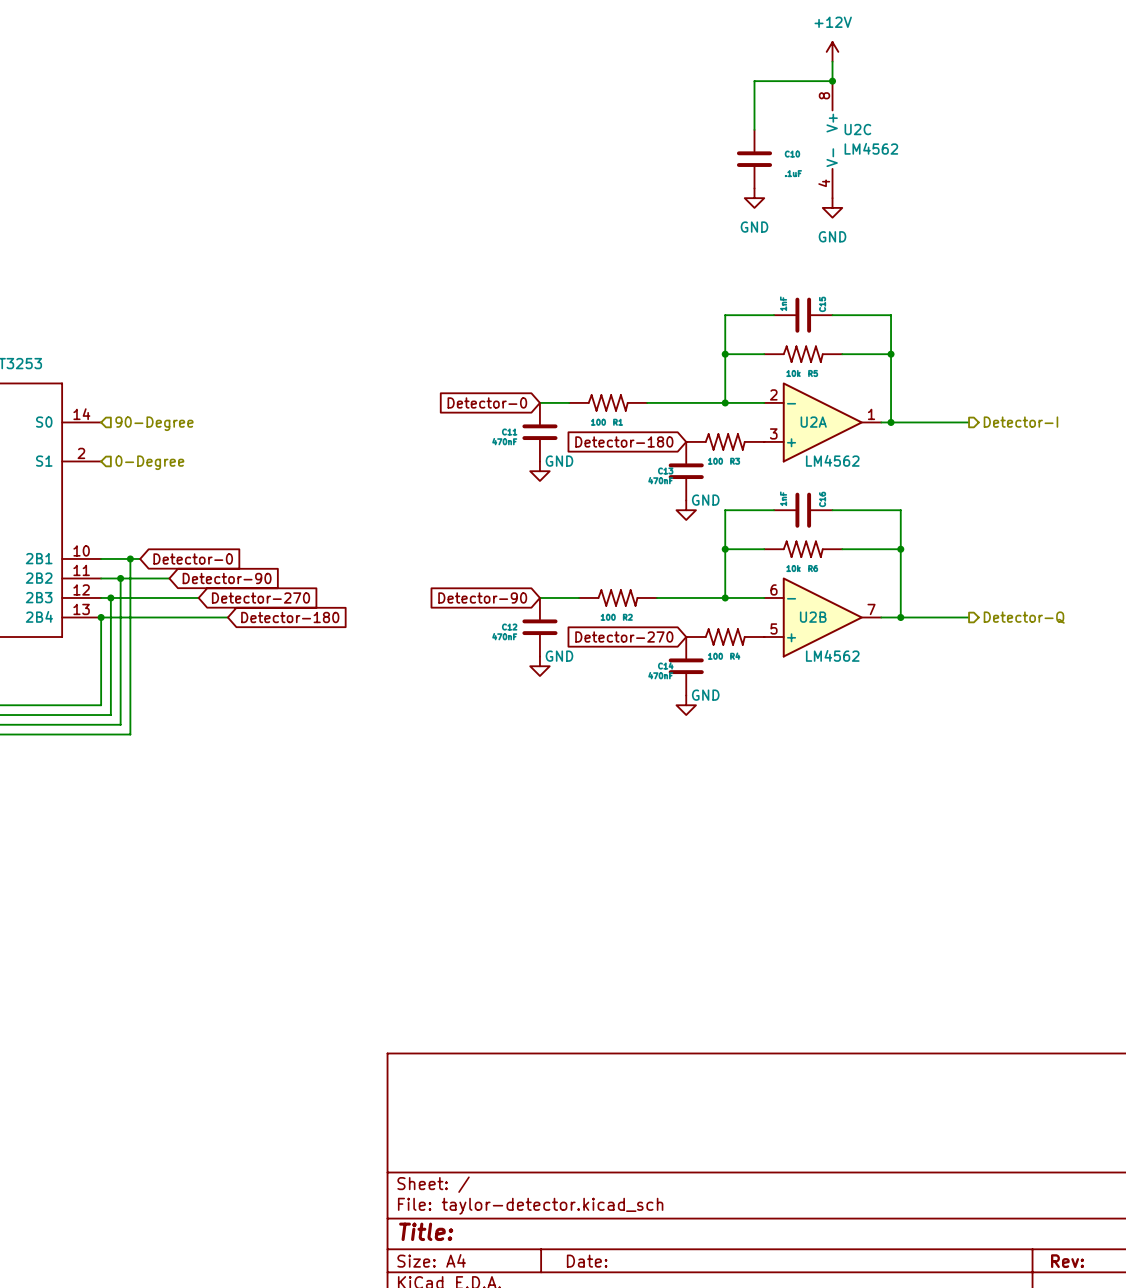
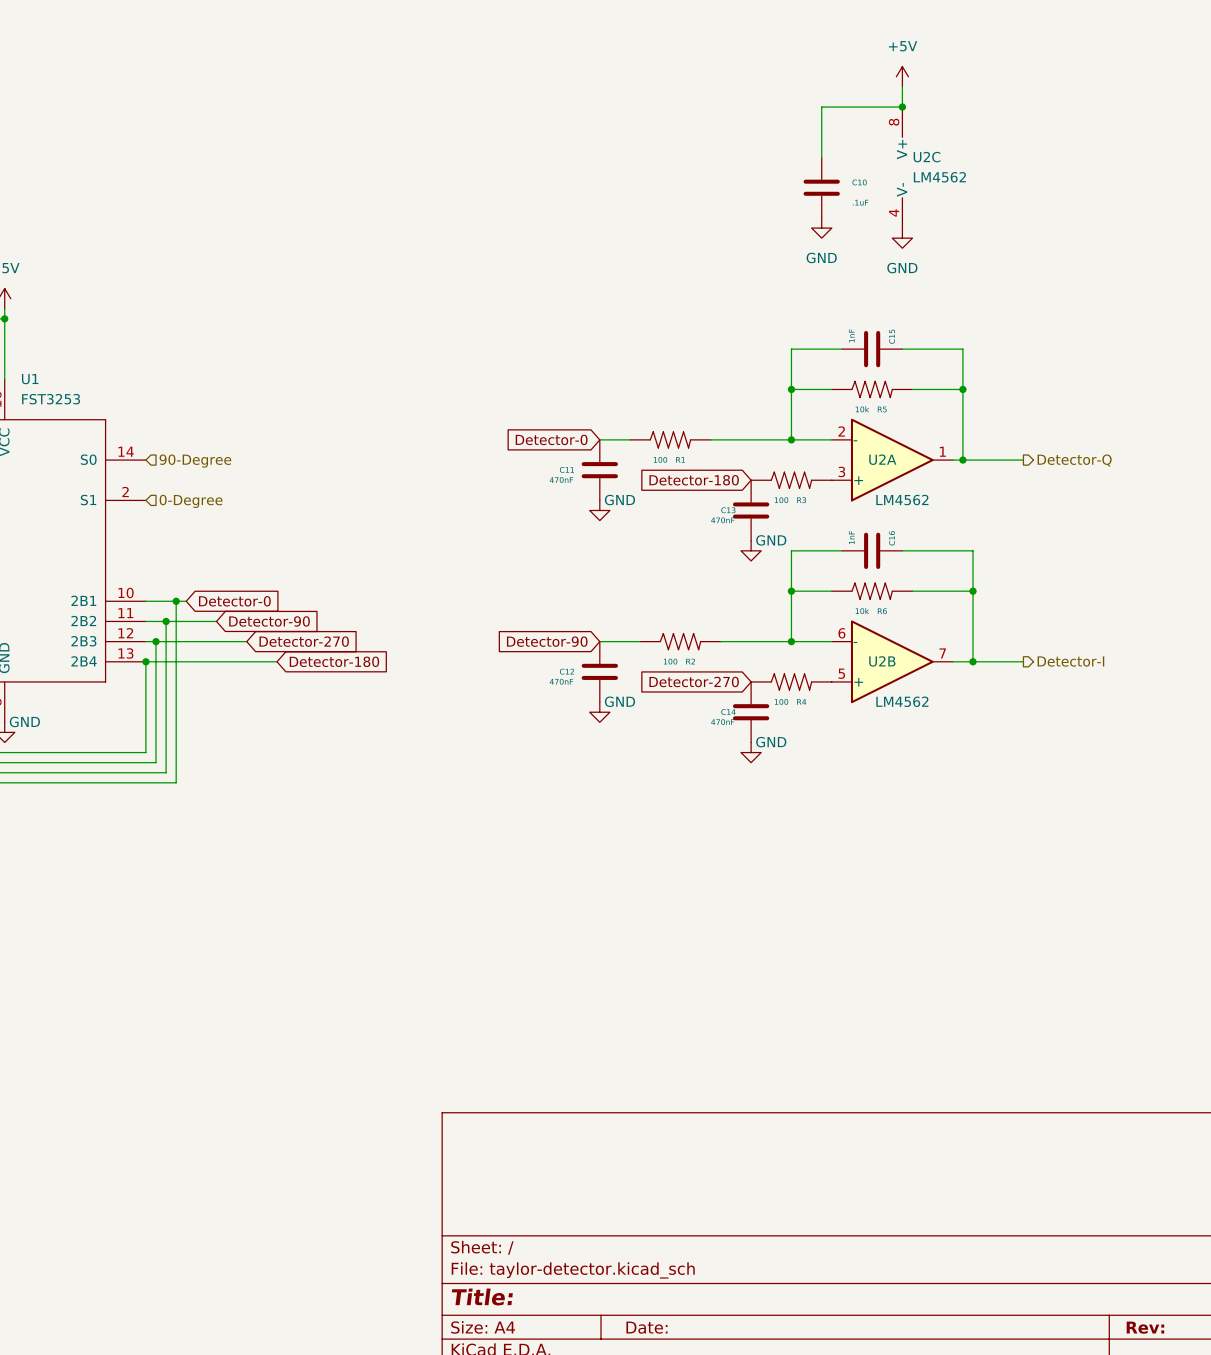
power symbol: +12V (832, 51) -> +5V (902, 76)
wire: (949, 422) (969, 422) -> none
hierarchical label: Detector-I (1020, 422) -> Detector-Q (1074, 460)
wire: (949, 617) (969, 617) -> none
hierarchical label: Detector-Q (1024, 617) -> Detector-I (1070, 661)

